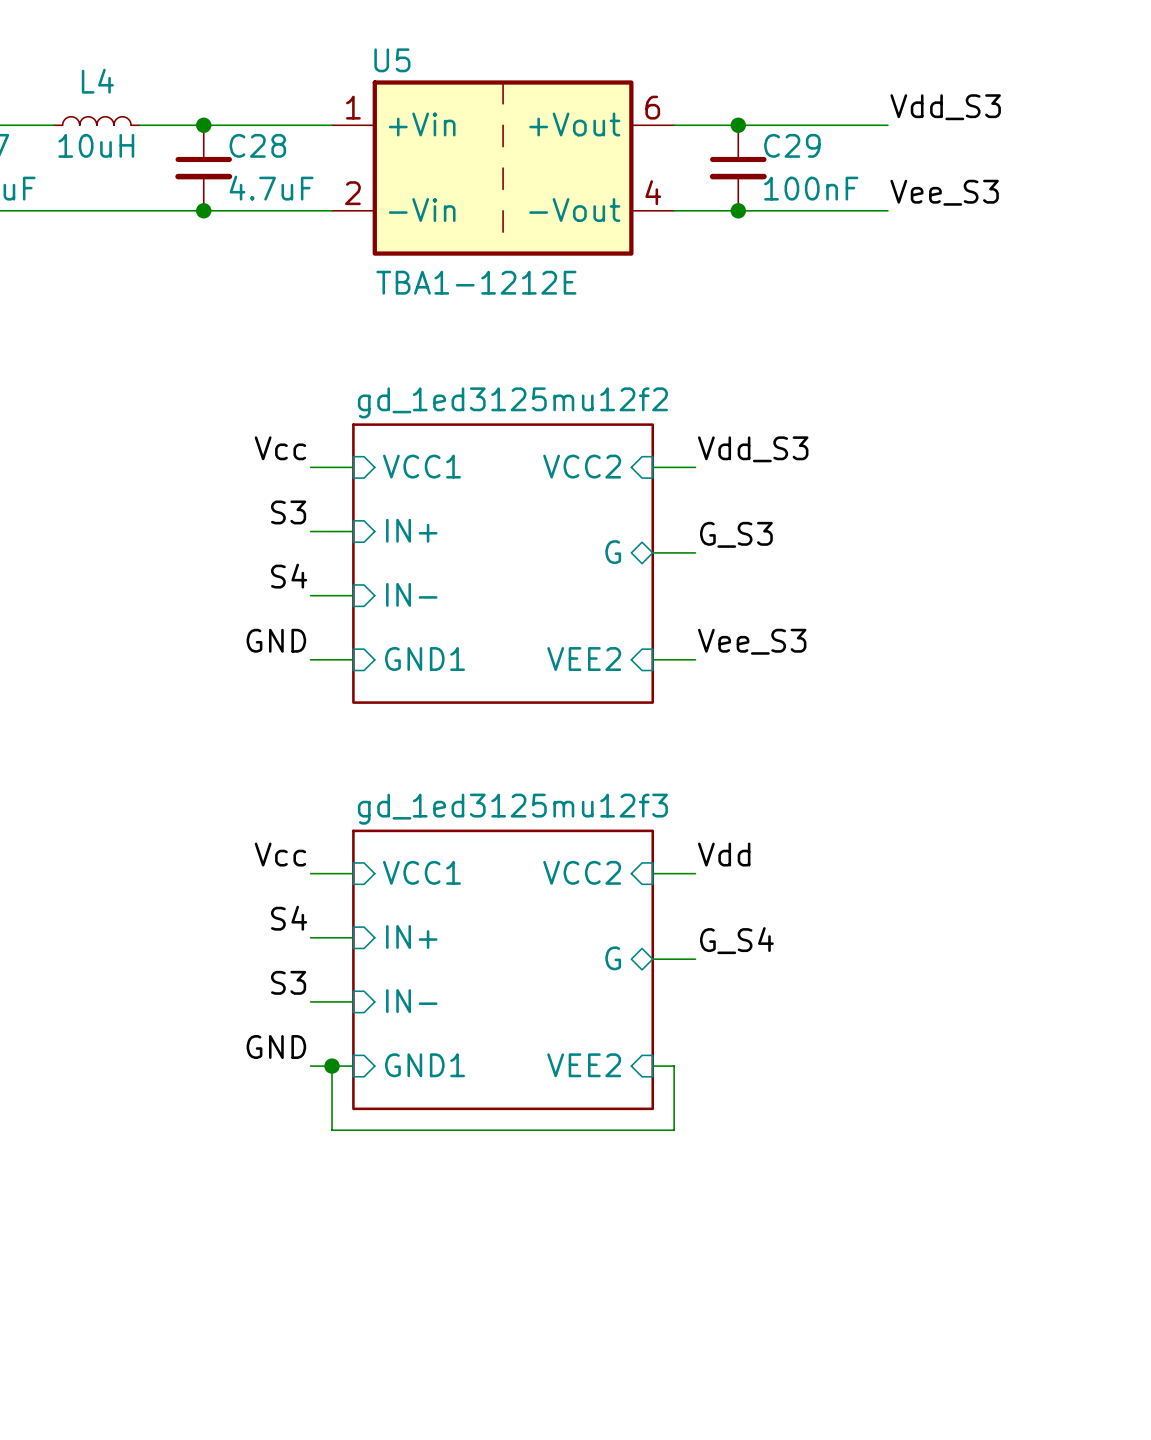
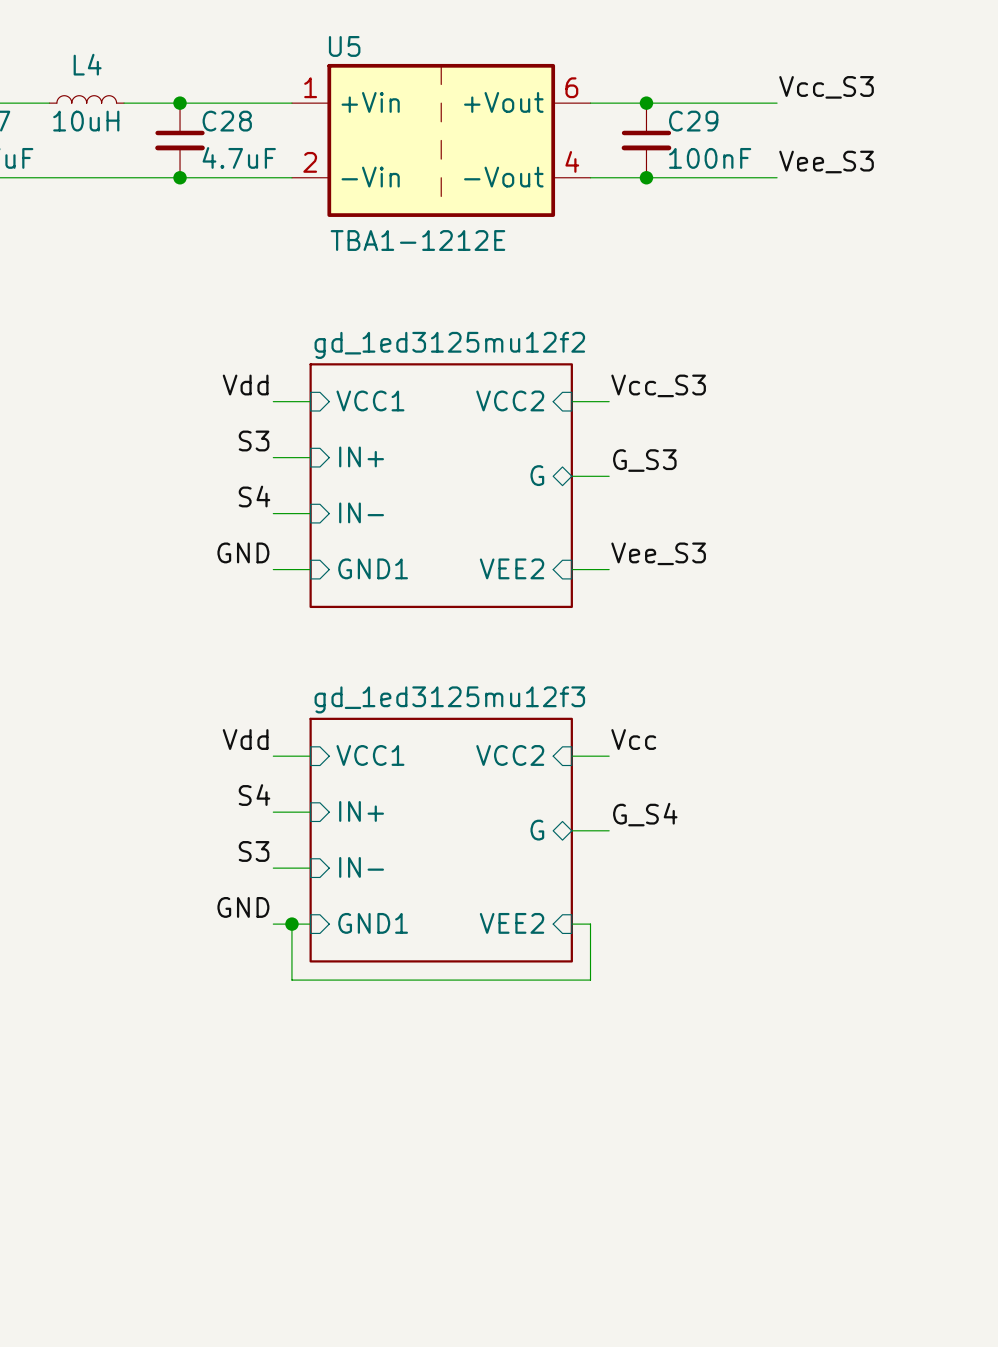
label: Vdd_S3 (945, 107) -> Vcc_S3 (826, 87)
label: Vcc (280, 448) -> Vdd (245, 385)
label: Vdd_S3 (753, 449) -> Vcc_S3 (658, 385)
label: Vcc (280, 854) -> Vdd (245, 739)
label: Vdd (724, 854) -> Vcc (633, 739)

